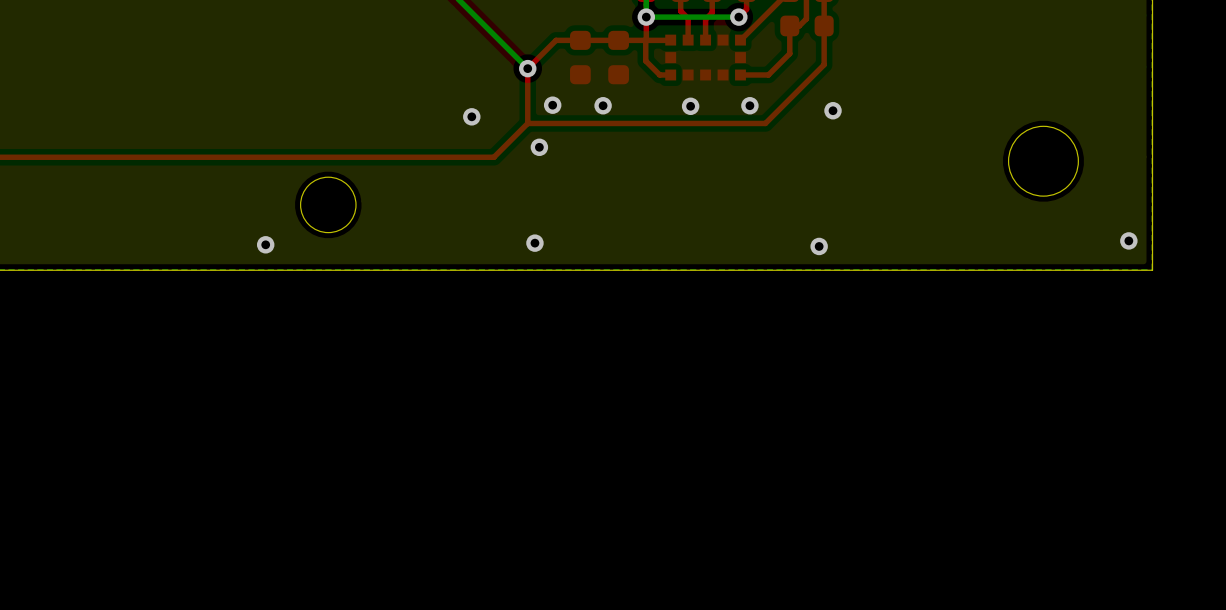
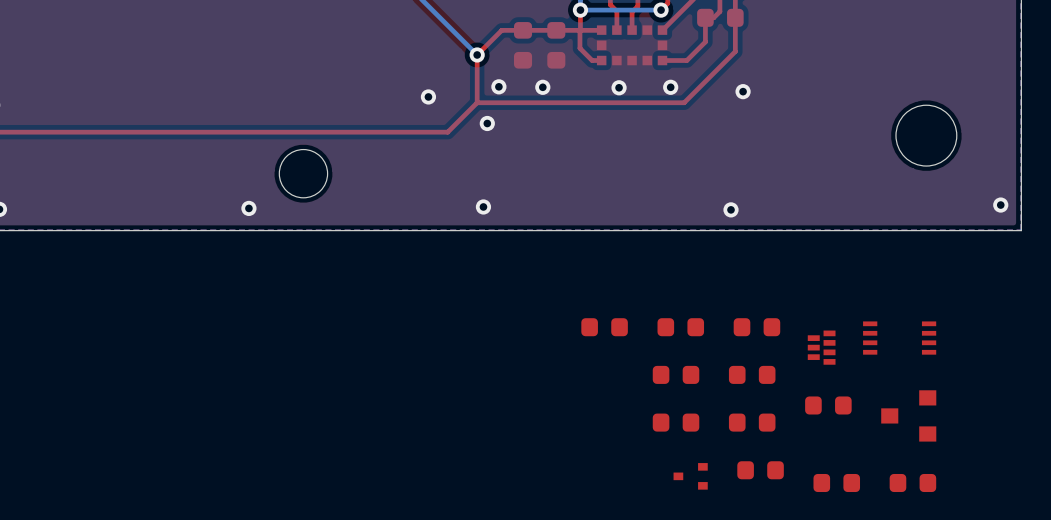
part: none -> (604, 327)
part: none -> (680, 327)
part: none -> (756, 327)
part: none -> (899, 338)
part: none -> (821, 347)
part: none -> (676, 374)
part: none -> (752, 374)
part: none -> (828, 405)
part: none -> (908, 415)
part: none -> (676, 422)
part: none -> (752, 422)
part: none -> (760, 470)
part: none -> (690, 476)
part: none -> (836, 482)
part: none -> (912, 482)

